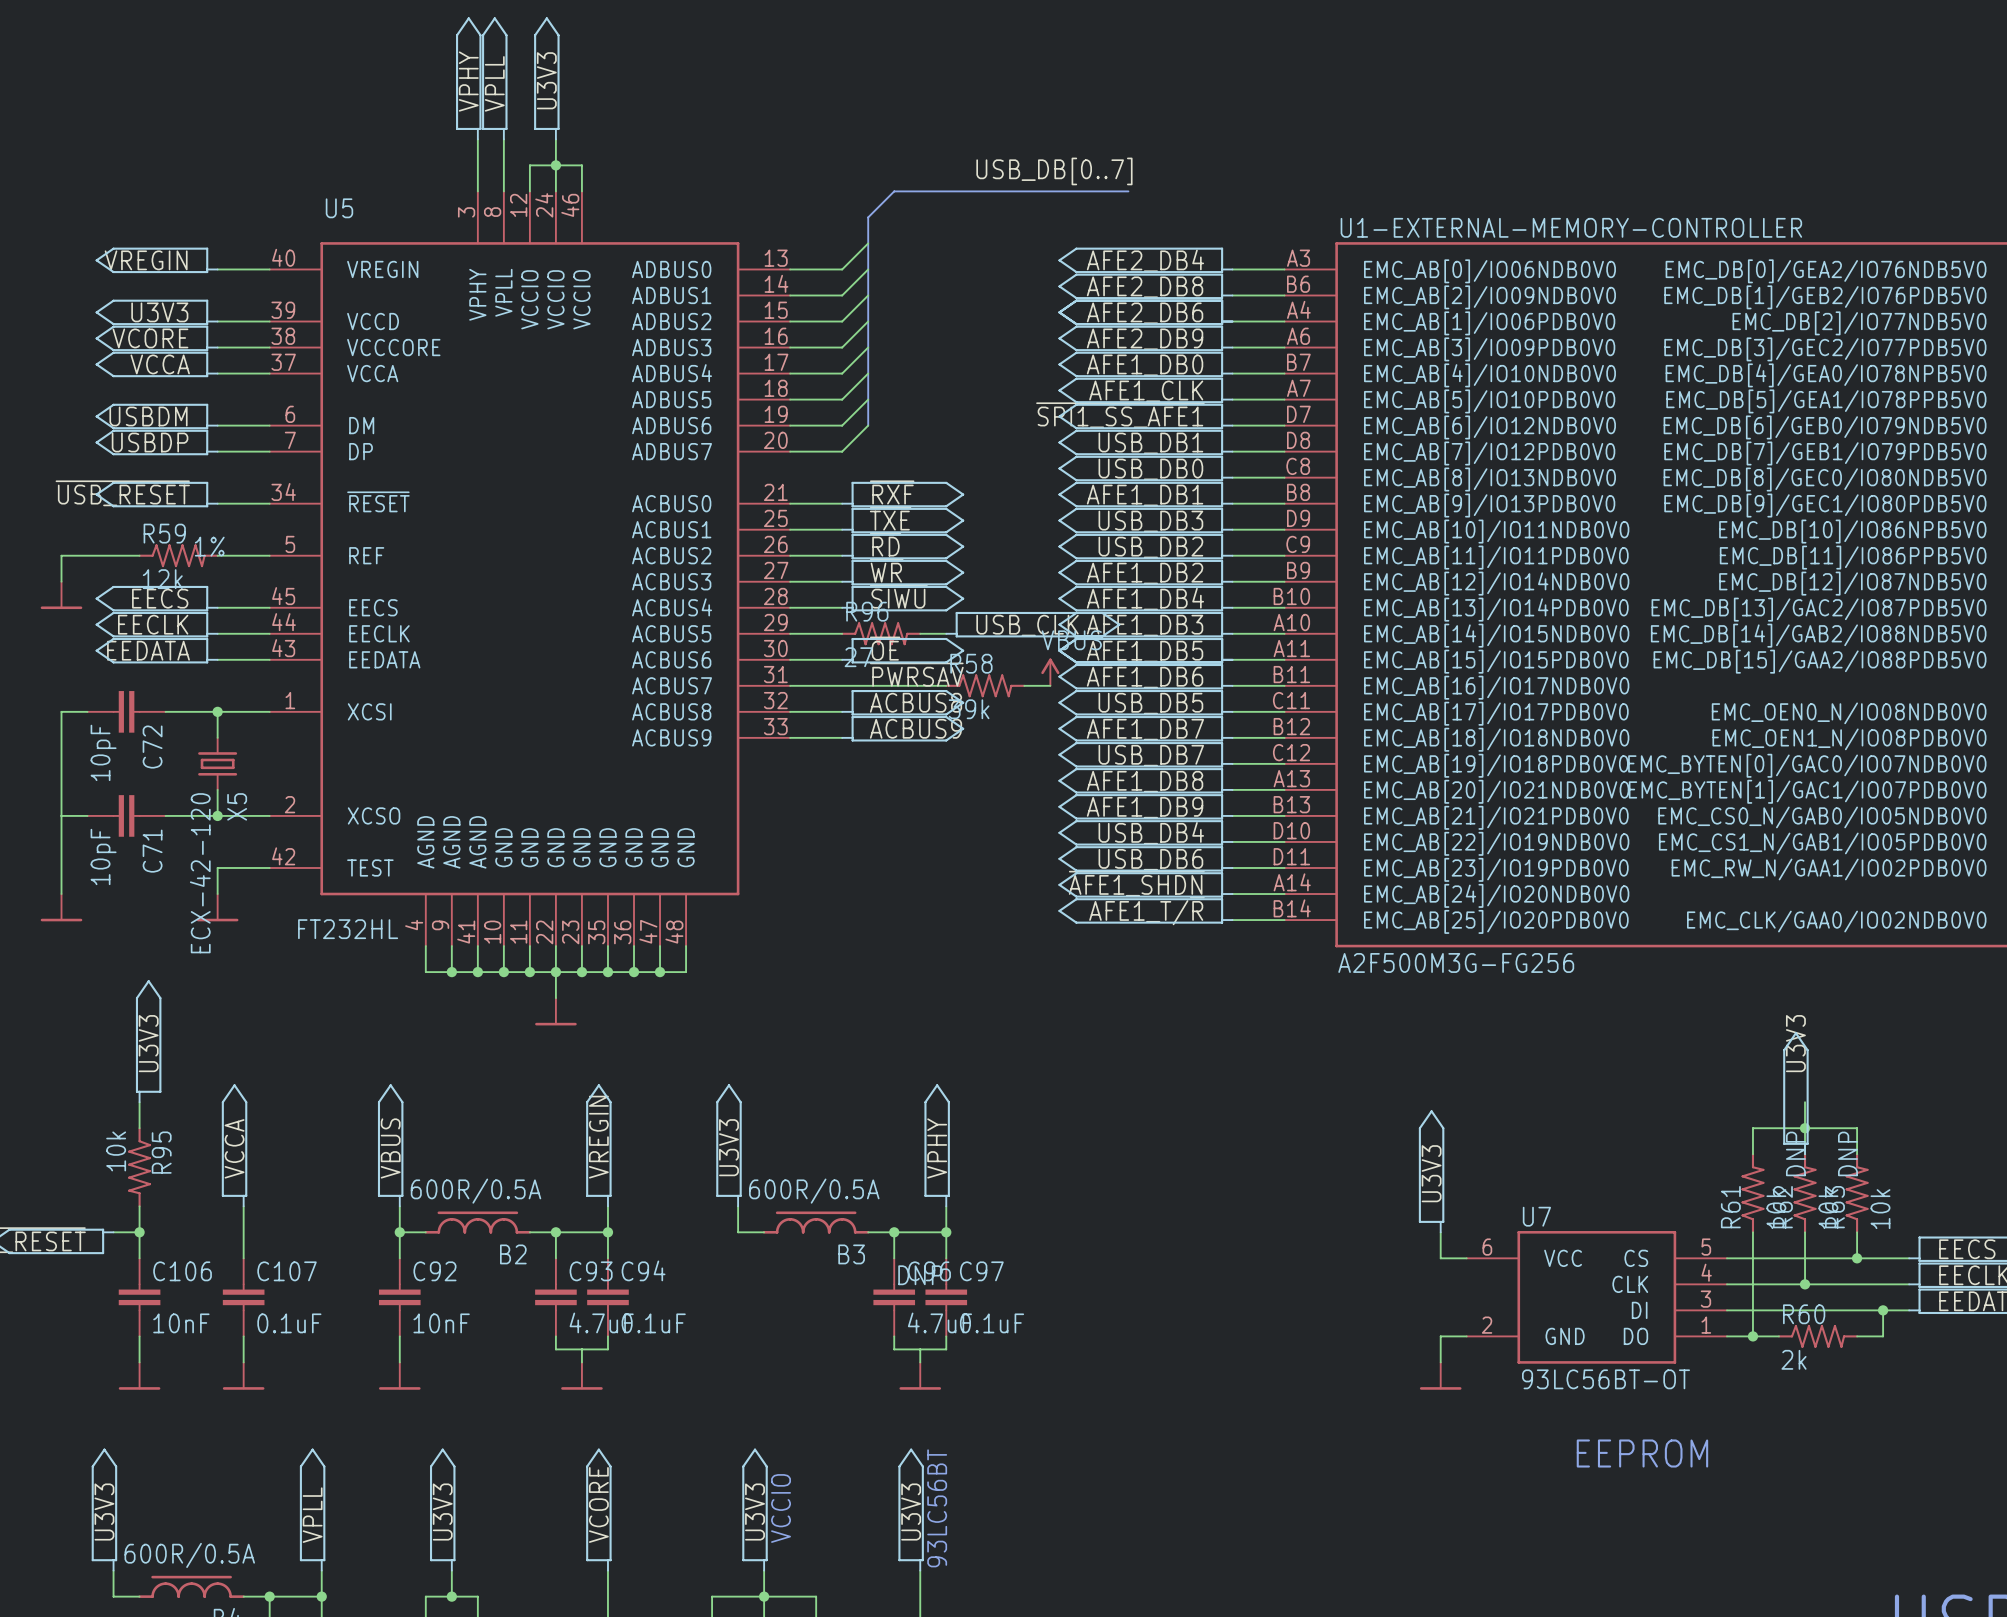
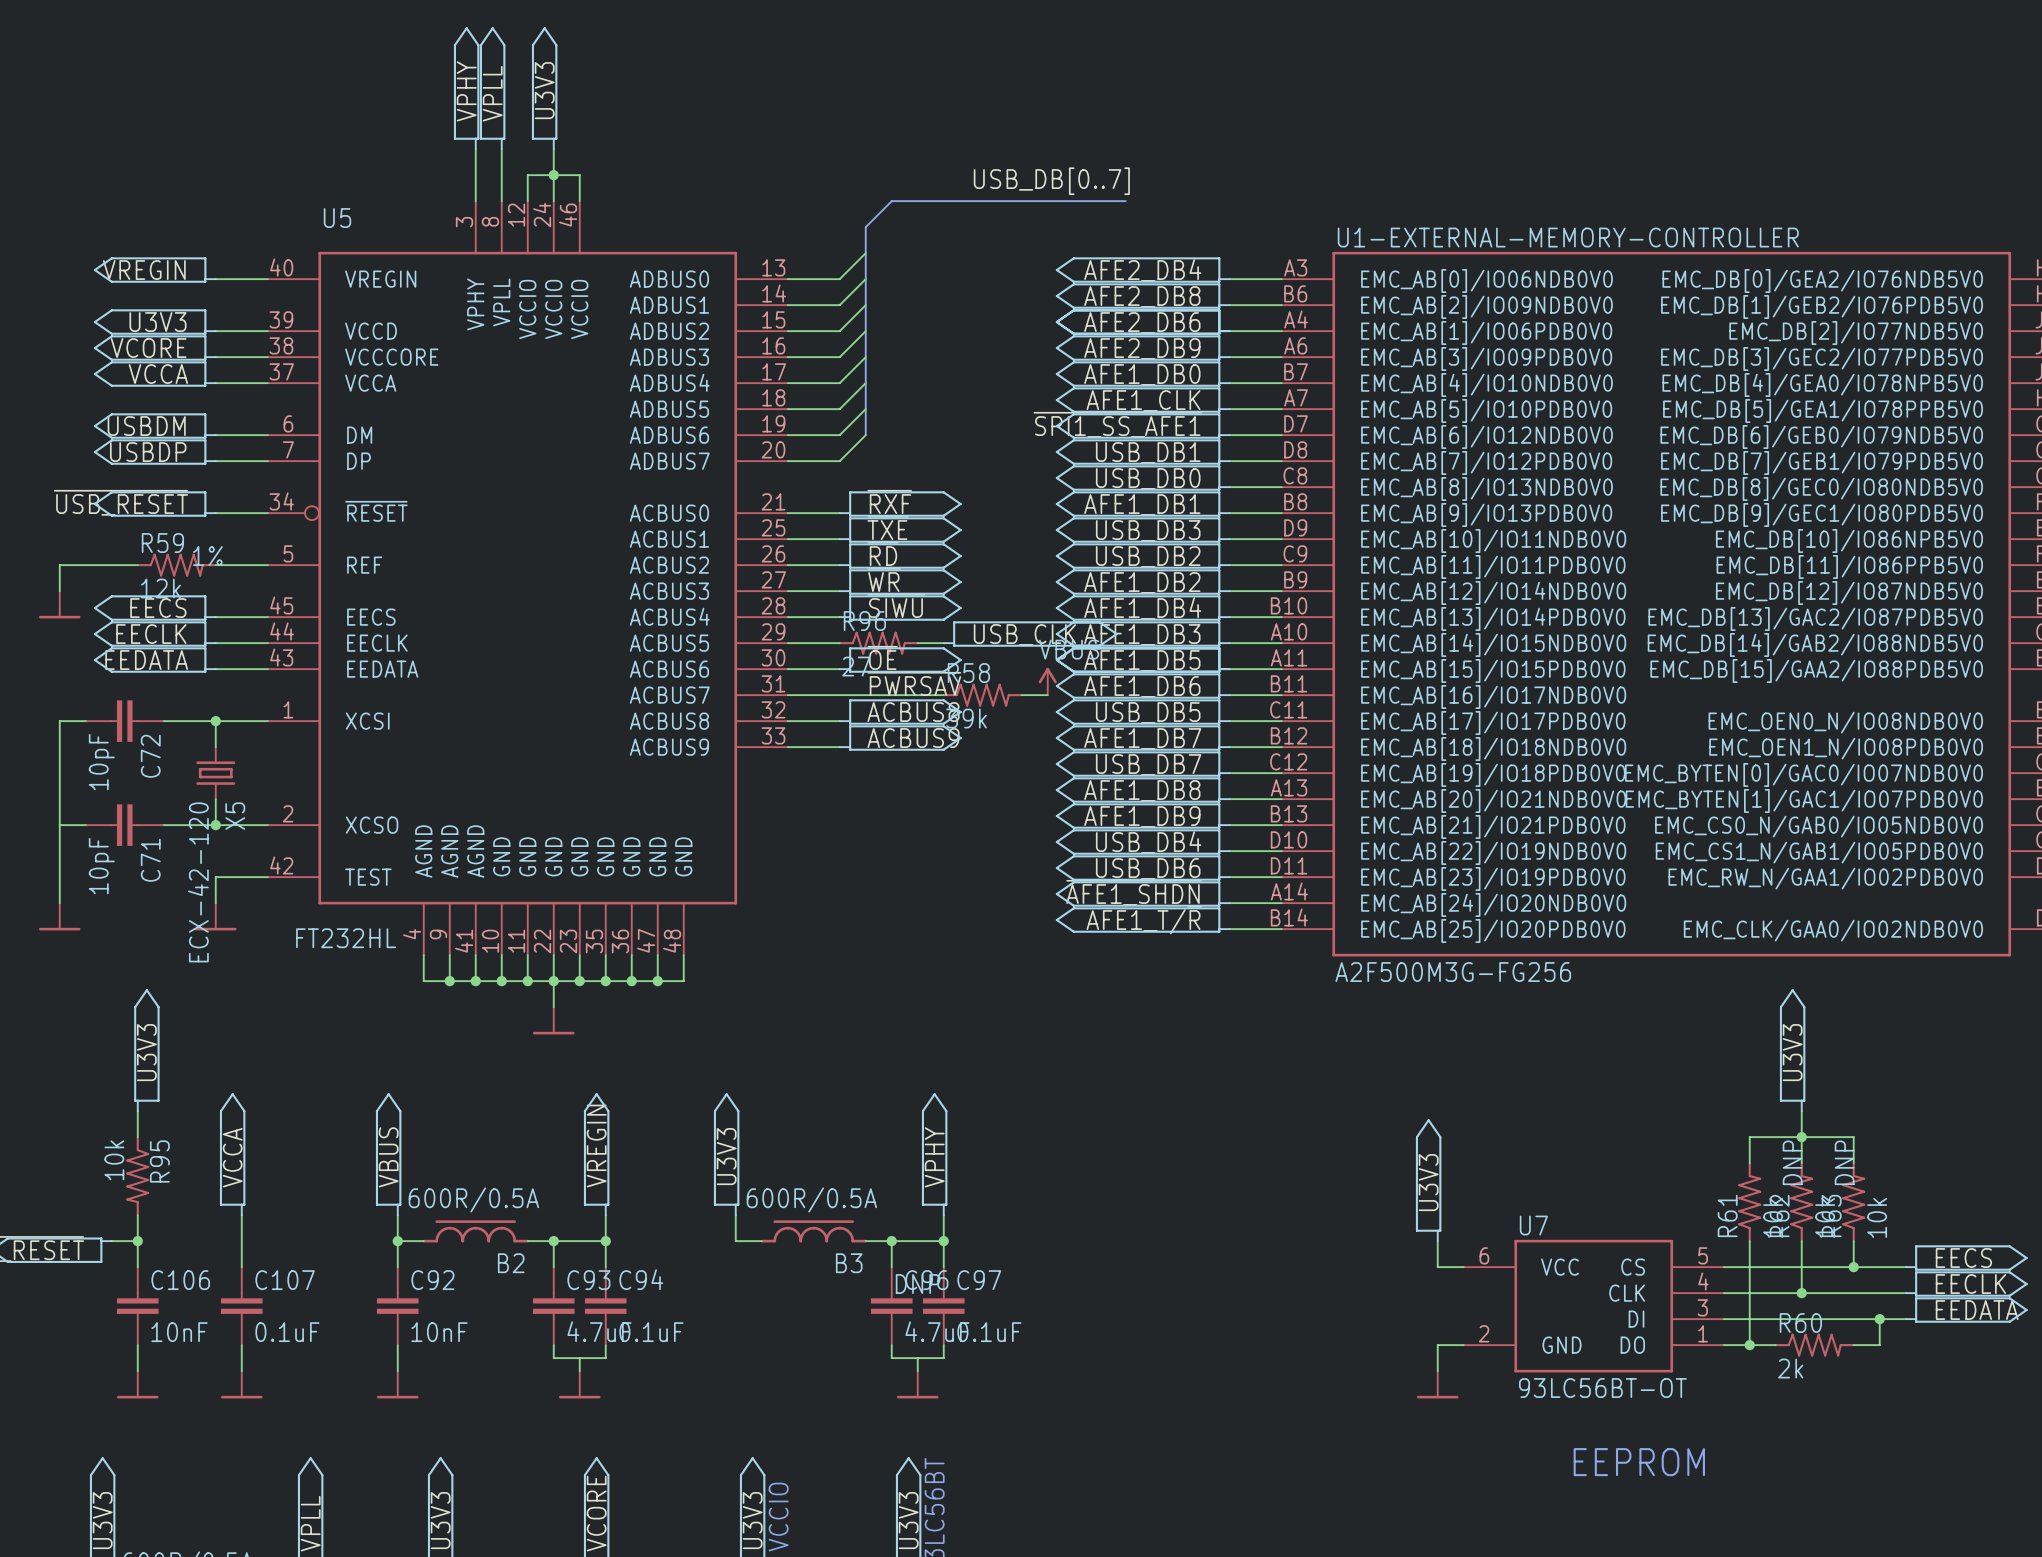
U5 symbol: [269, 191, 791, 947] -> [267, 201, 788, 956]
part position: (1795, 1093) -> (1792, 1050)

